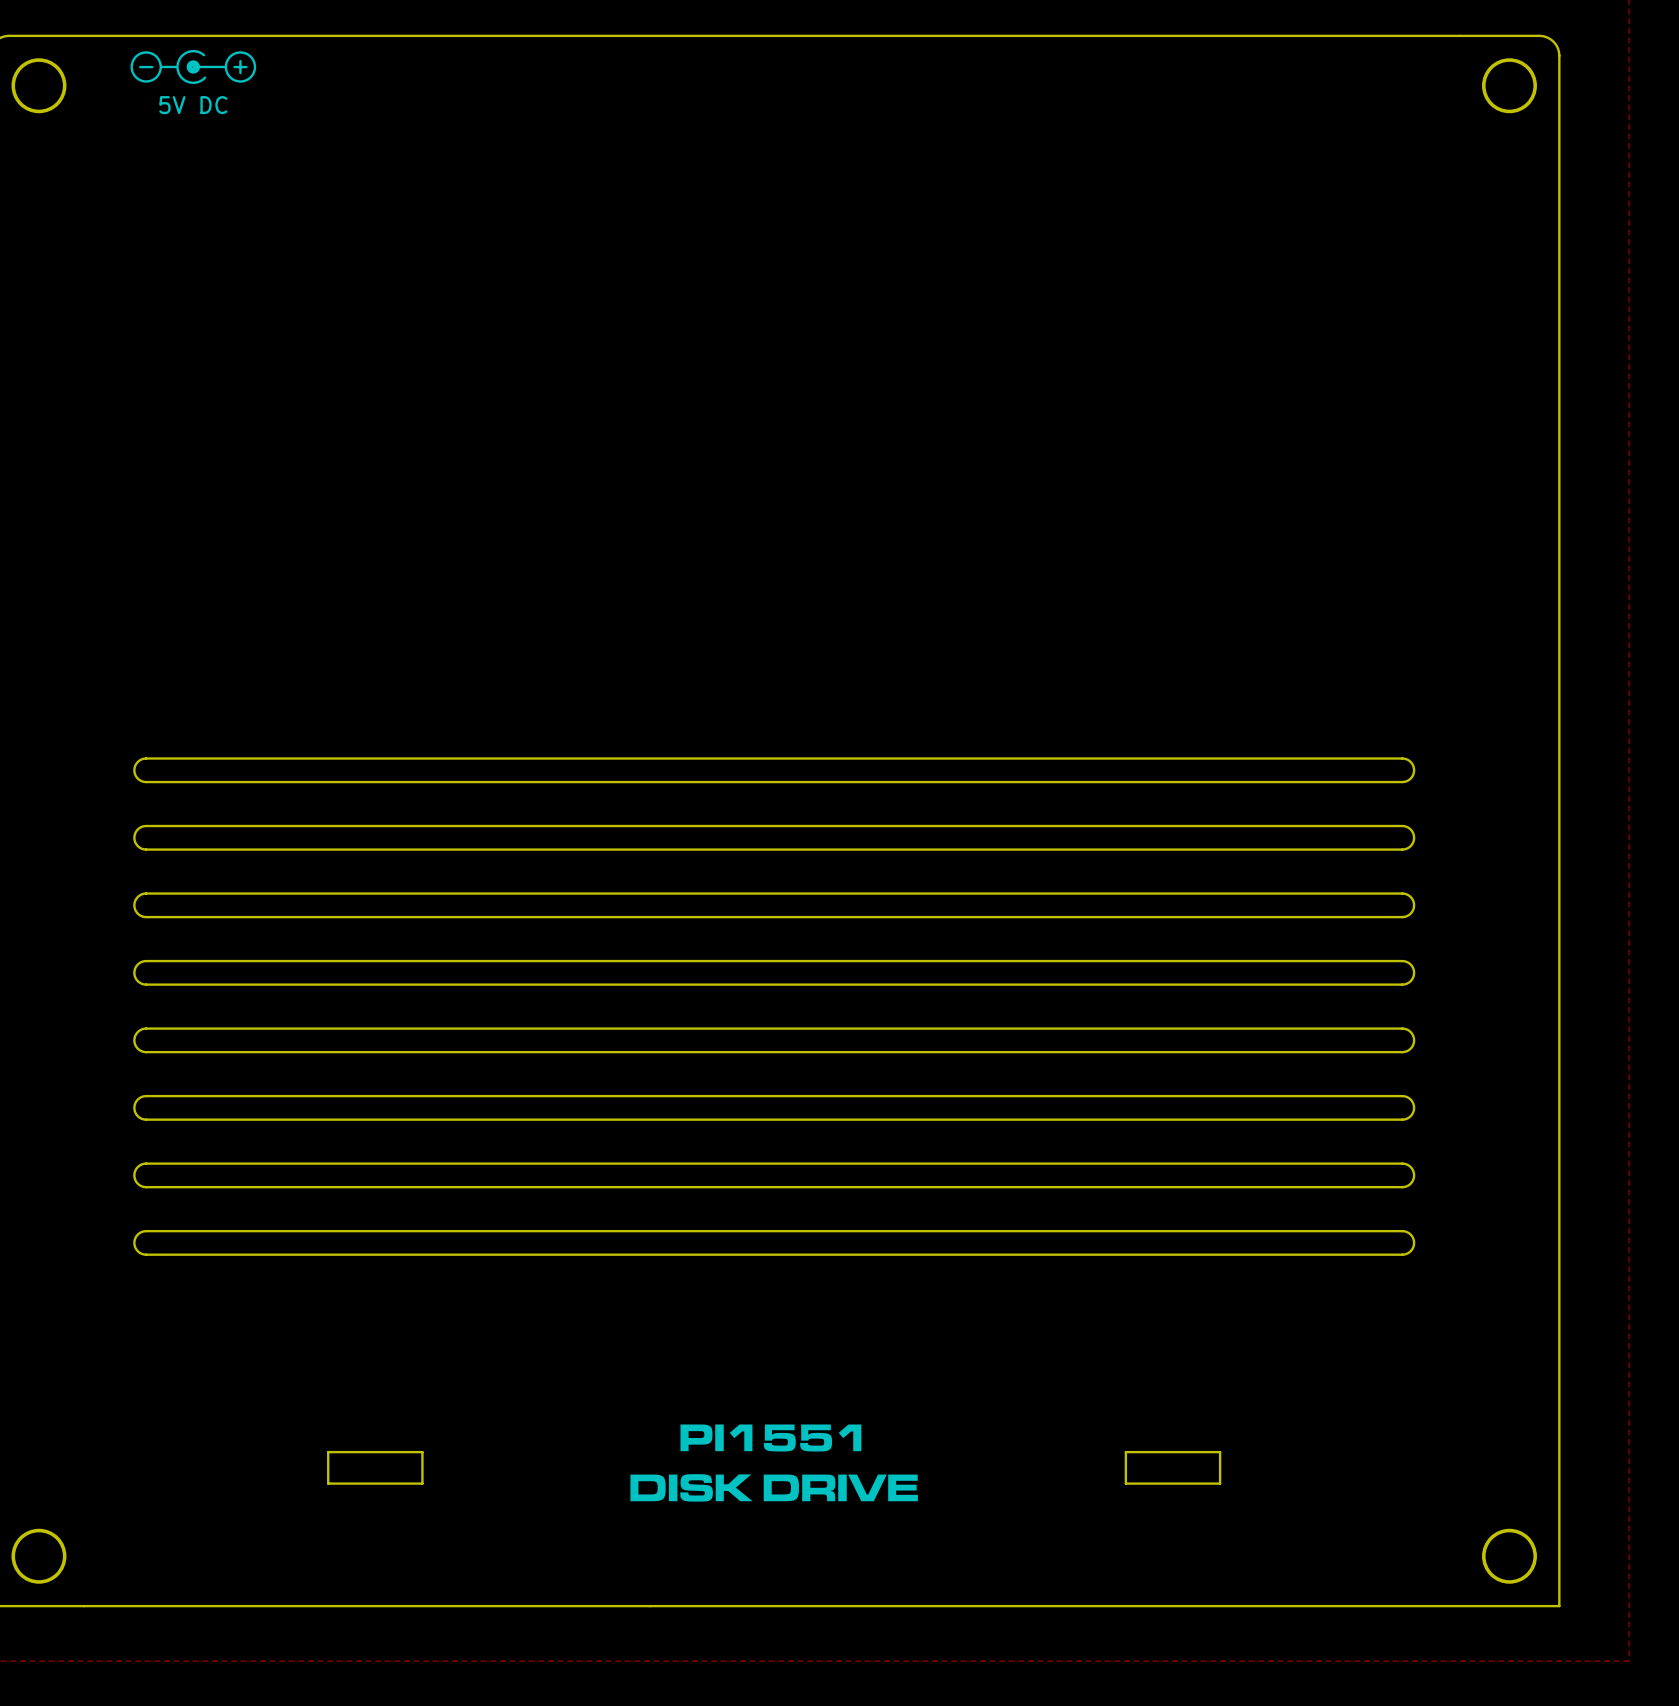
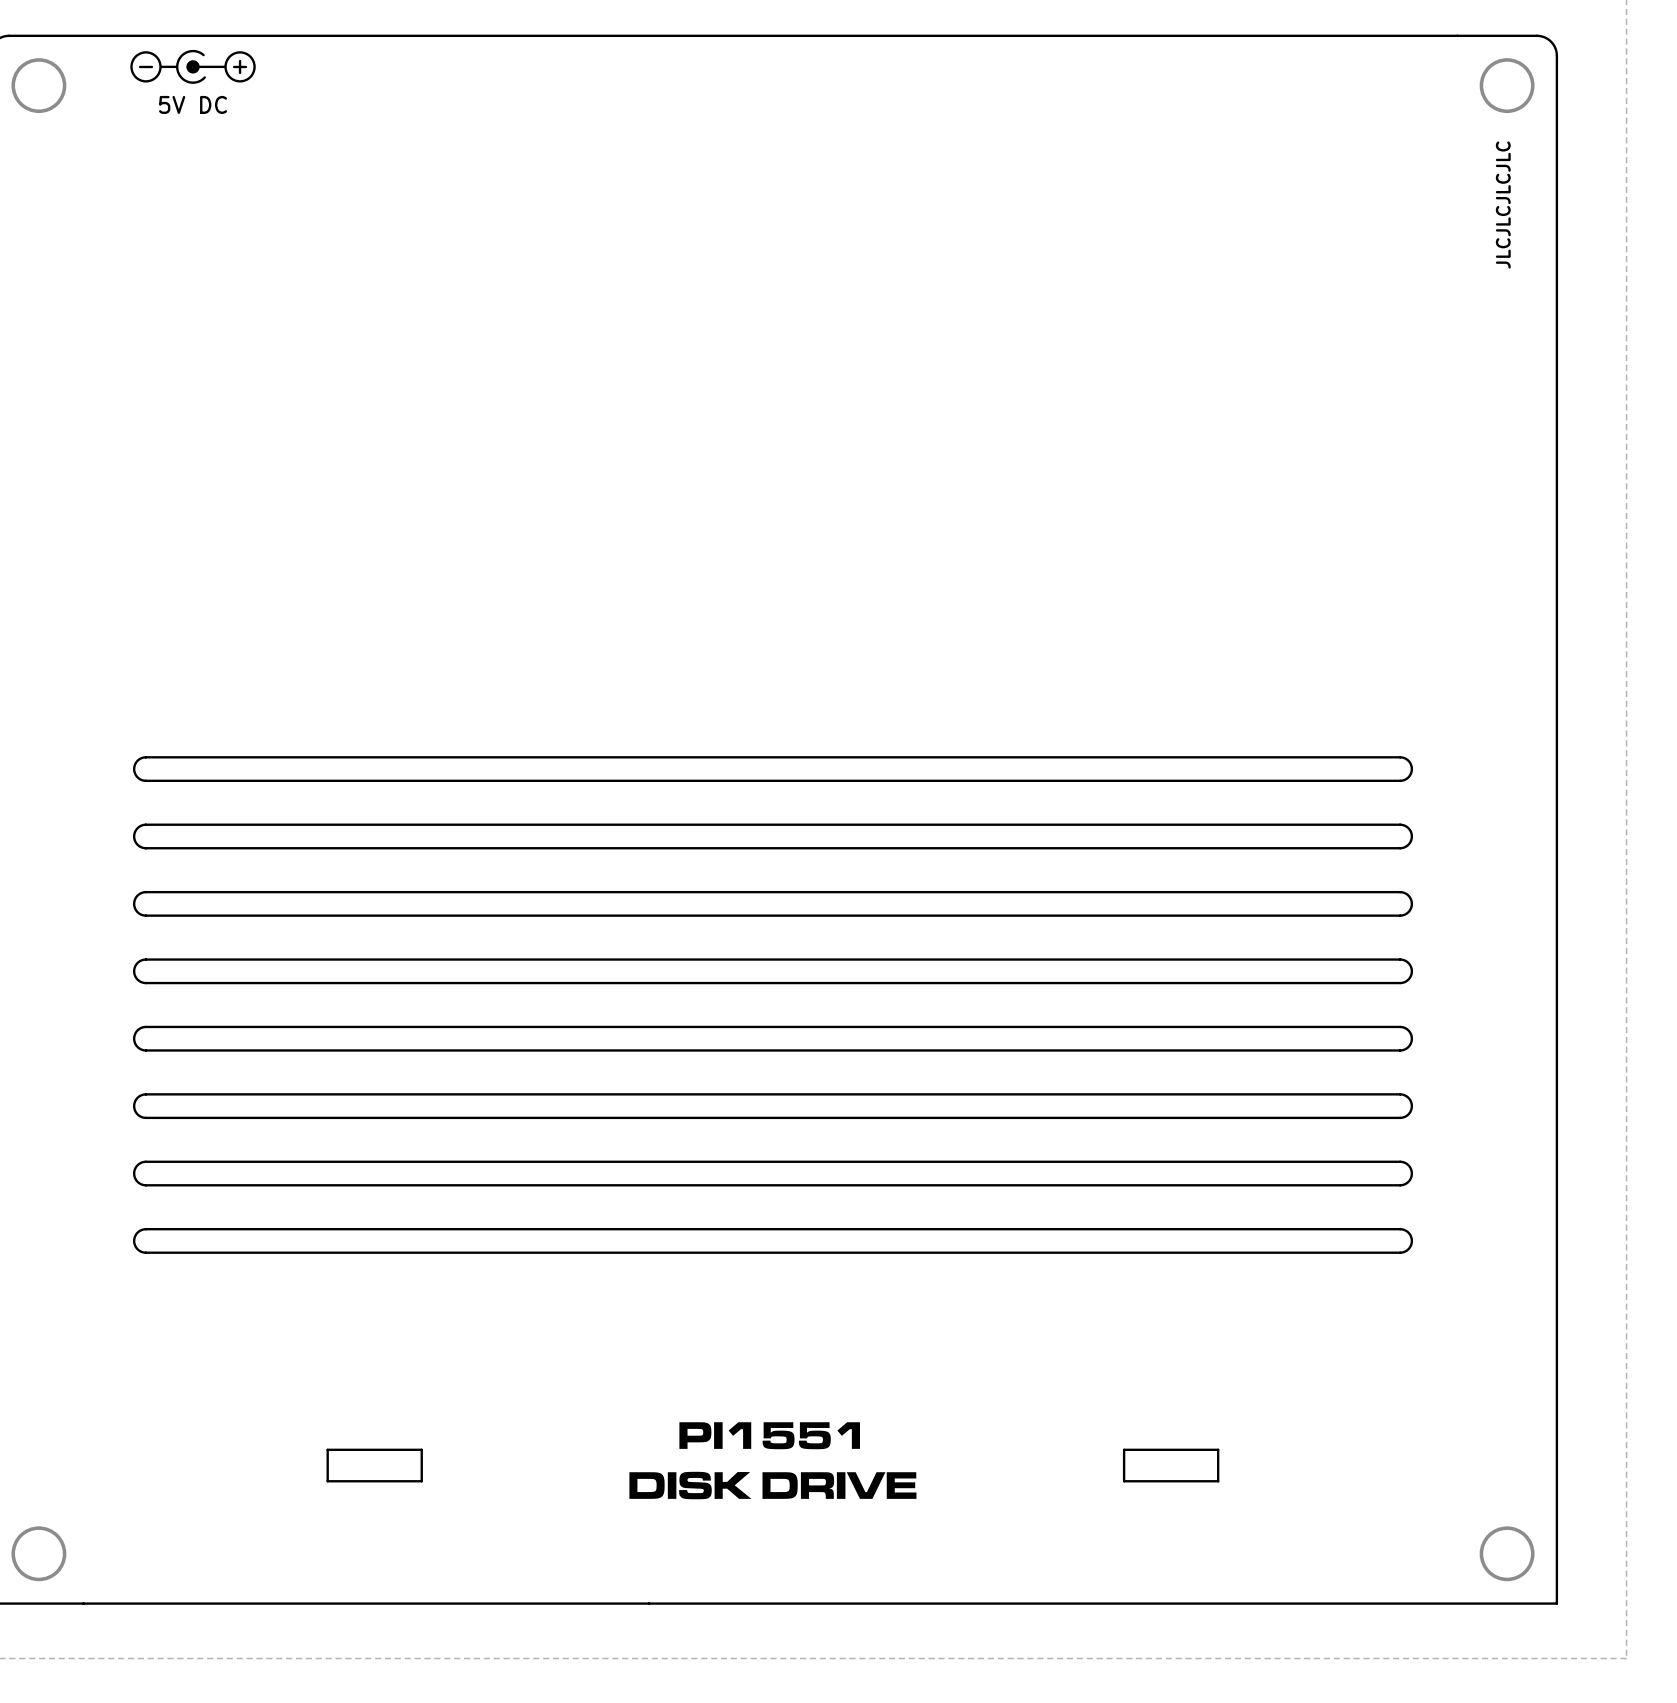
text: none -> JLCJLCJLCJLC (1503, 205)

